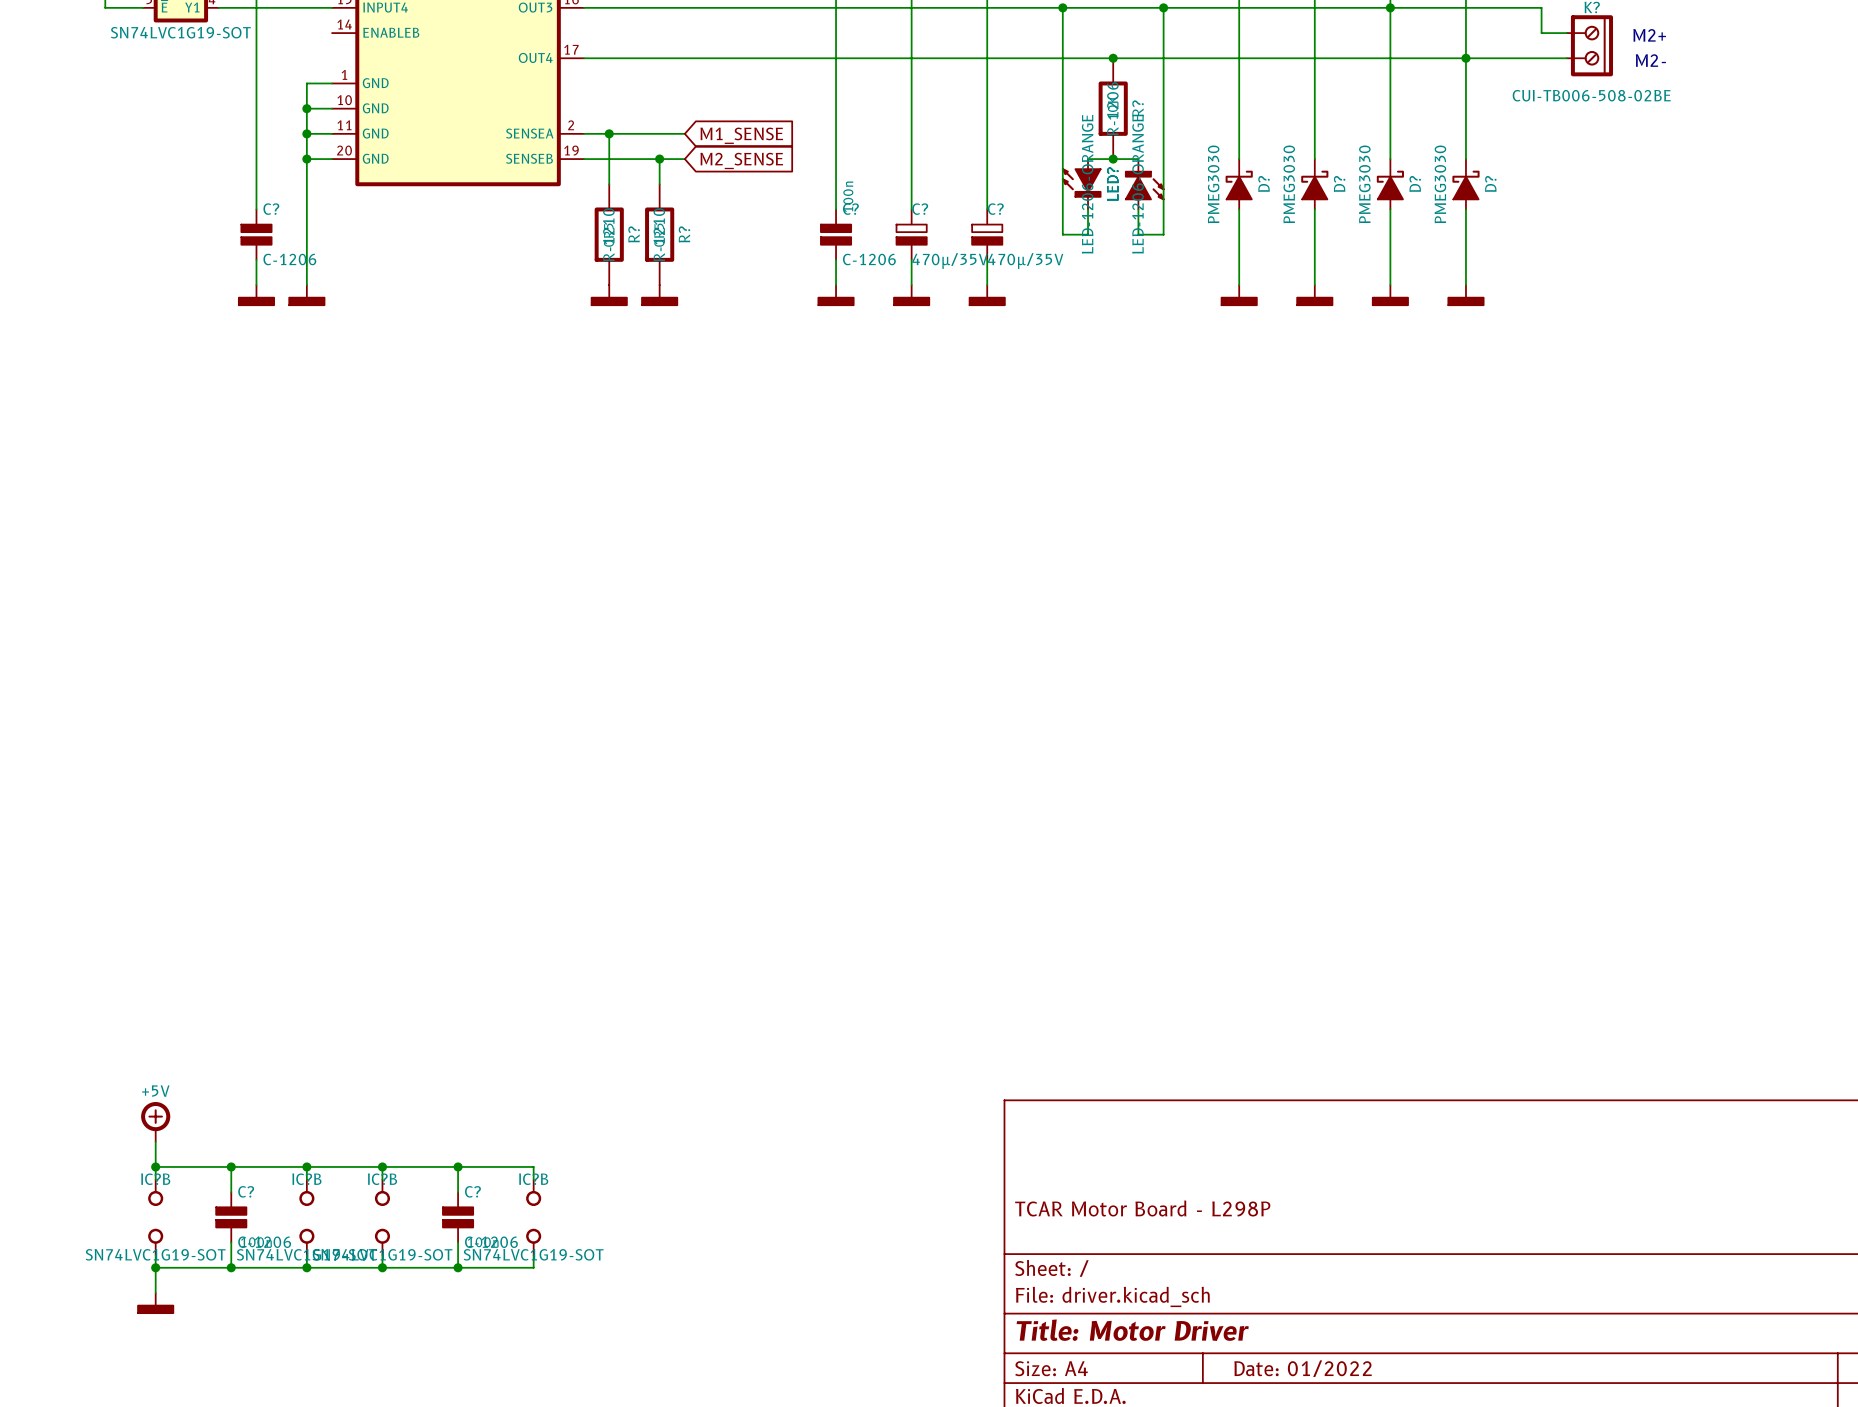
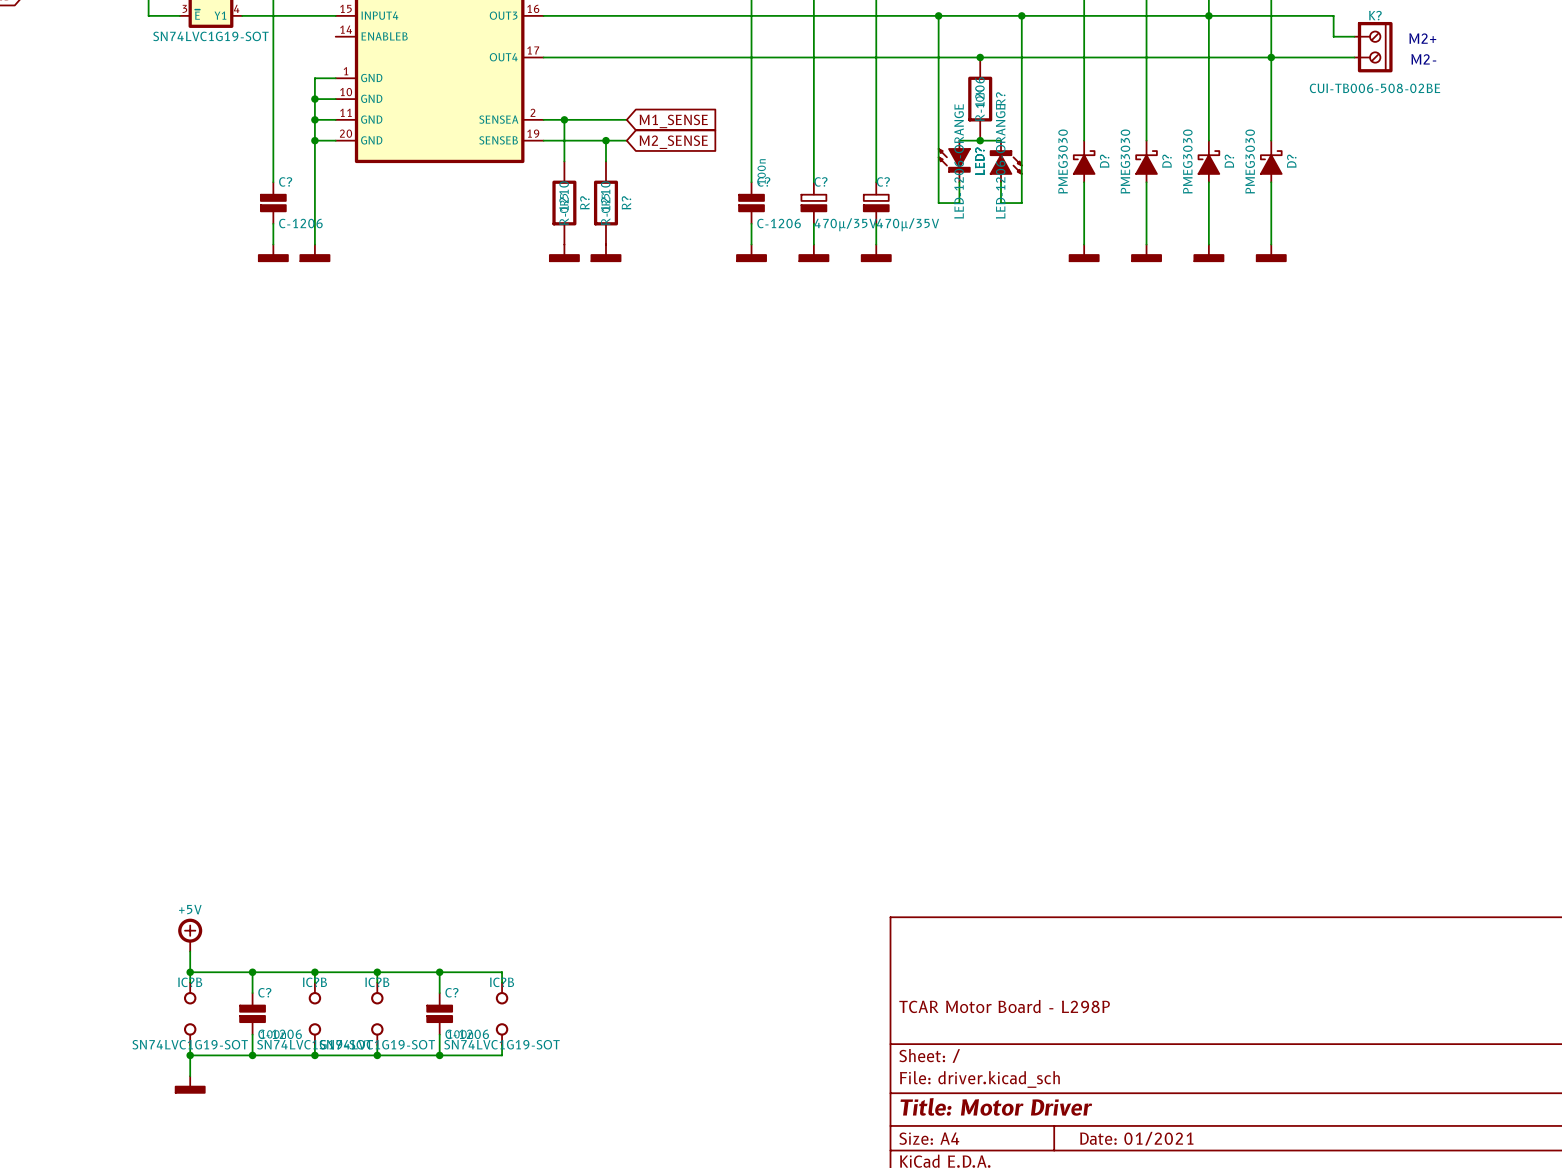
title block: Date: 01/2022 (1303, 1368) -> Date: 01/2021 (1136, 1138)

